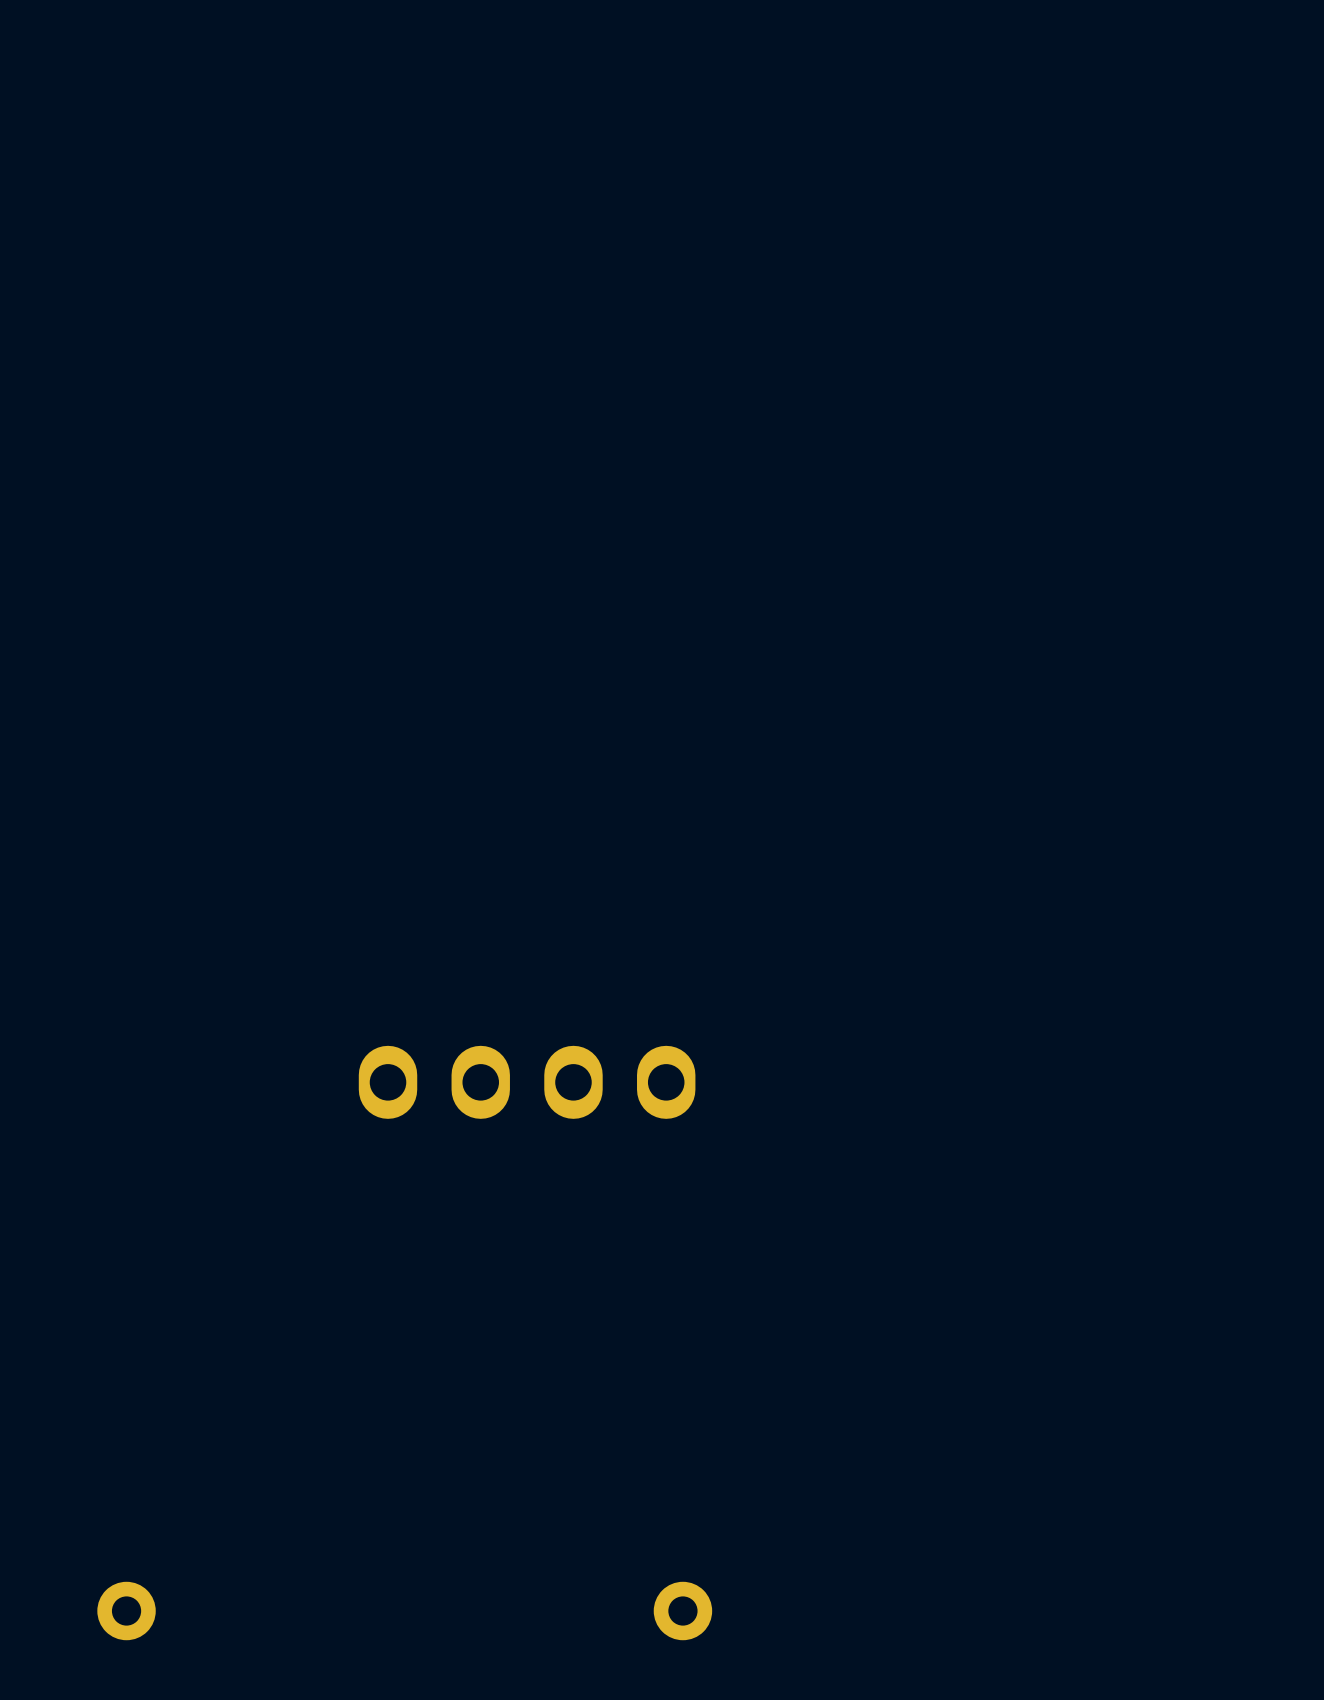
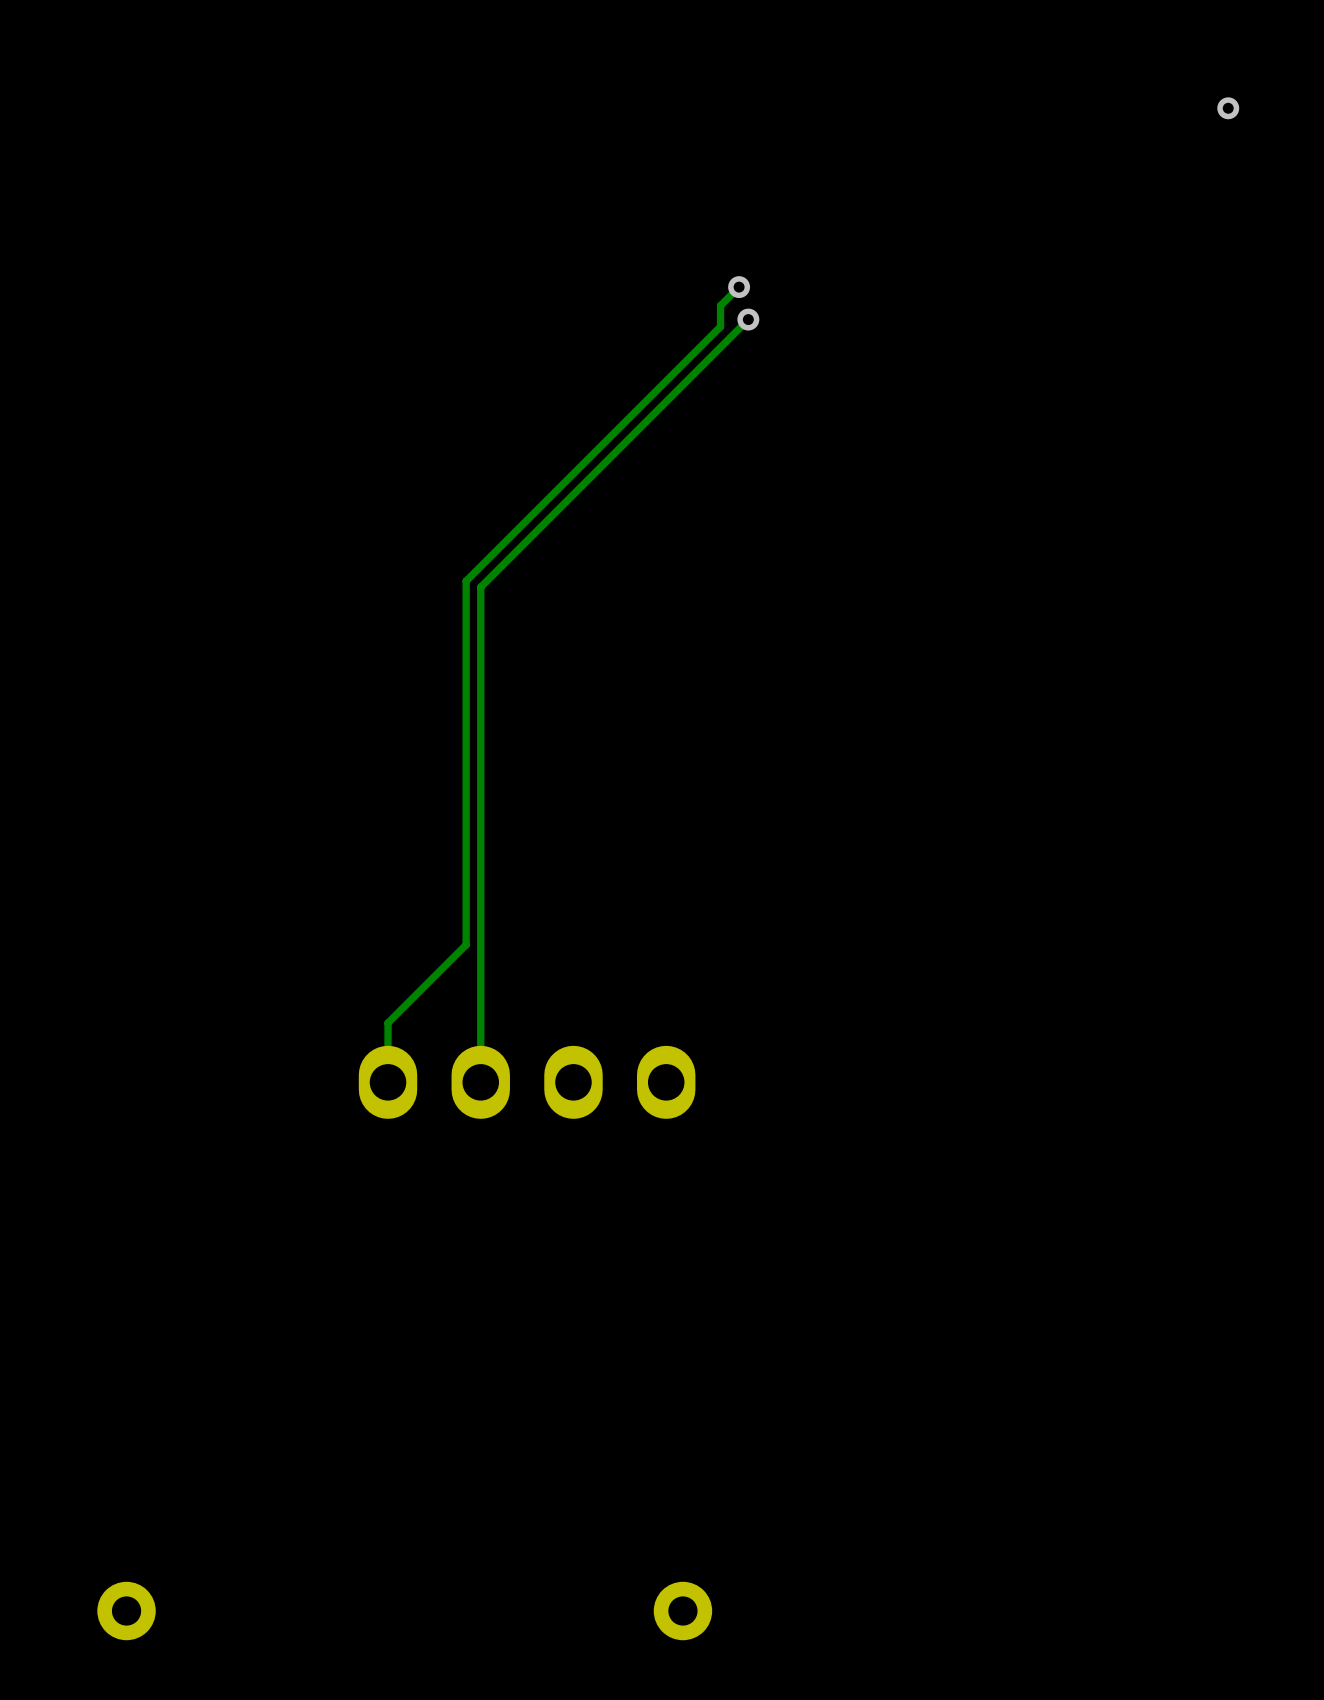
via: none -> (1228, 108)
track: none -> (739, 287) (720, 305) (720, 326) (466, 581) (466, 944) (388, 1023) (388, 1082)
via: none -> (739, 287)
track: none -> (748, 319) (480, 587) (480, 1082)
via: none -> (748, 319)

